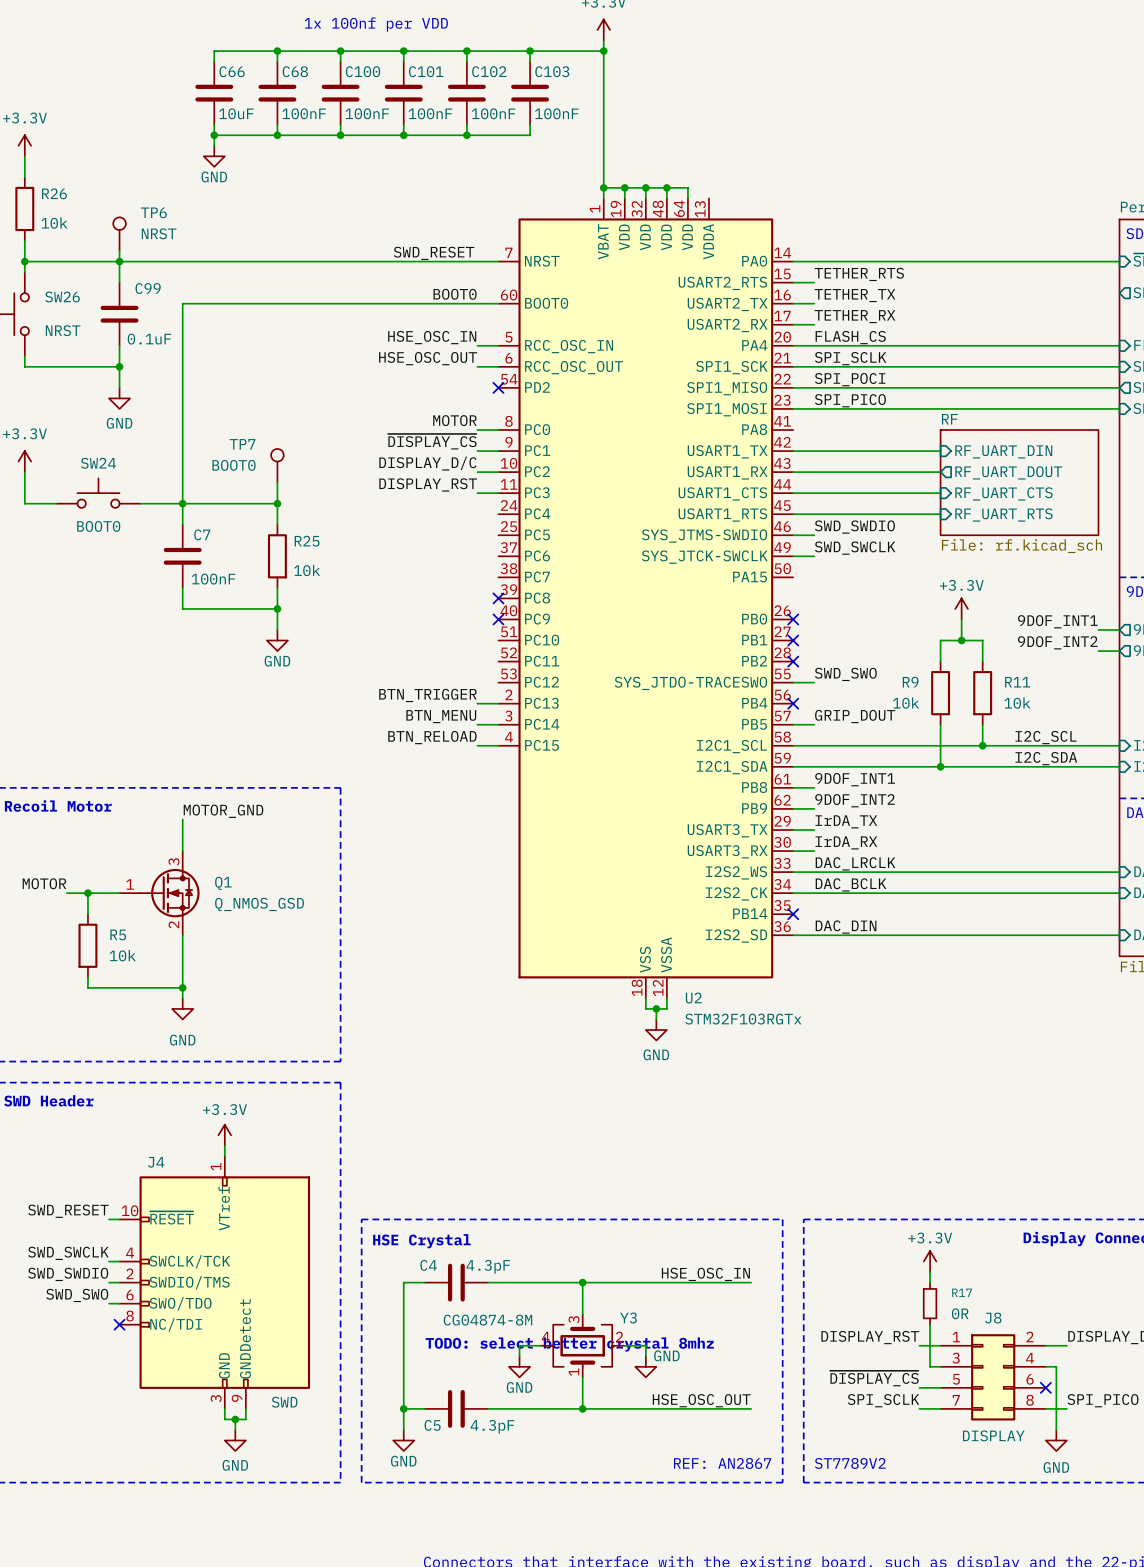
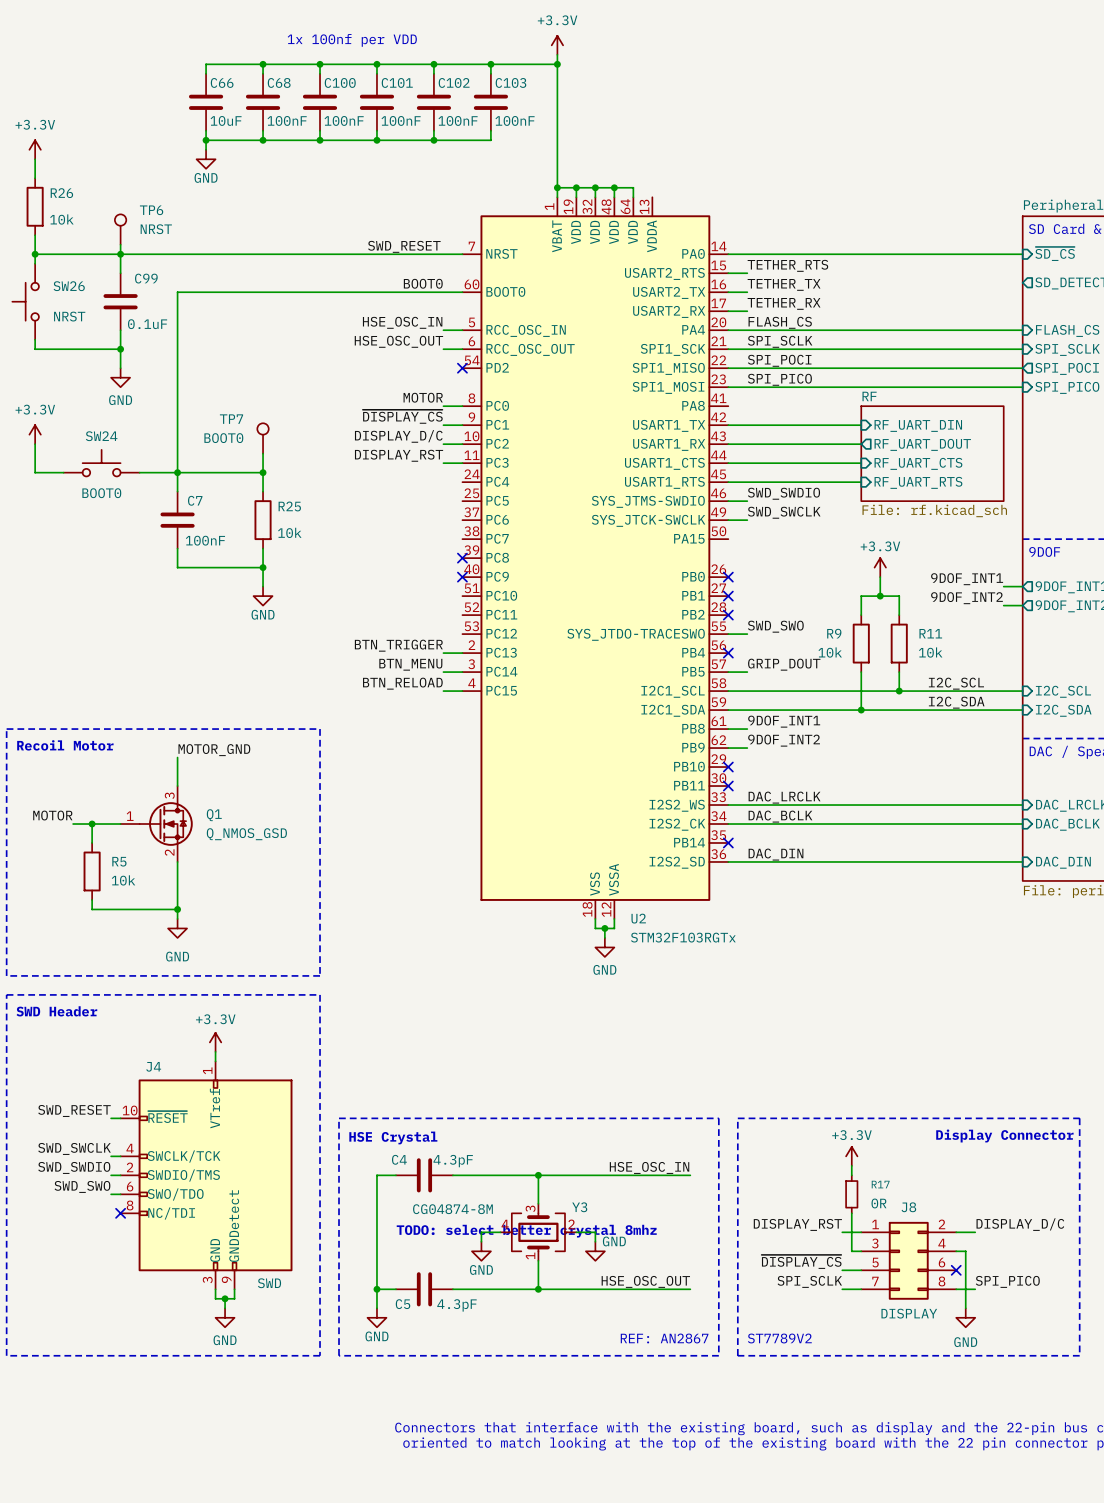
label: IrDA_TX (846, 821) -> none
wire: (793, 829) (814, 829) -> none
no-connect mark: none -> (728, 767)
U2 pin name: USART3_TX (727, 830) -> PB10 (689, 766)
label: IrDA_RX (846, 842) -> none
U2 pin name: USART3_RX (727, 851) -> PB11 (689, 785)
wire: (793, 851) (814, 851) -> none
no-connect mark: none -> (728, 786)

